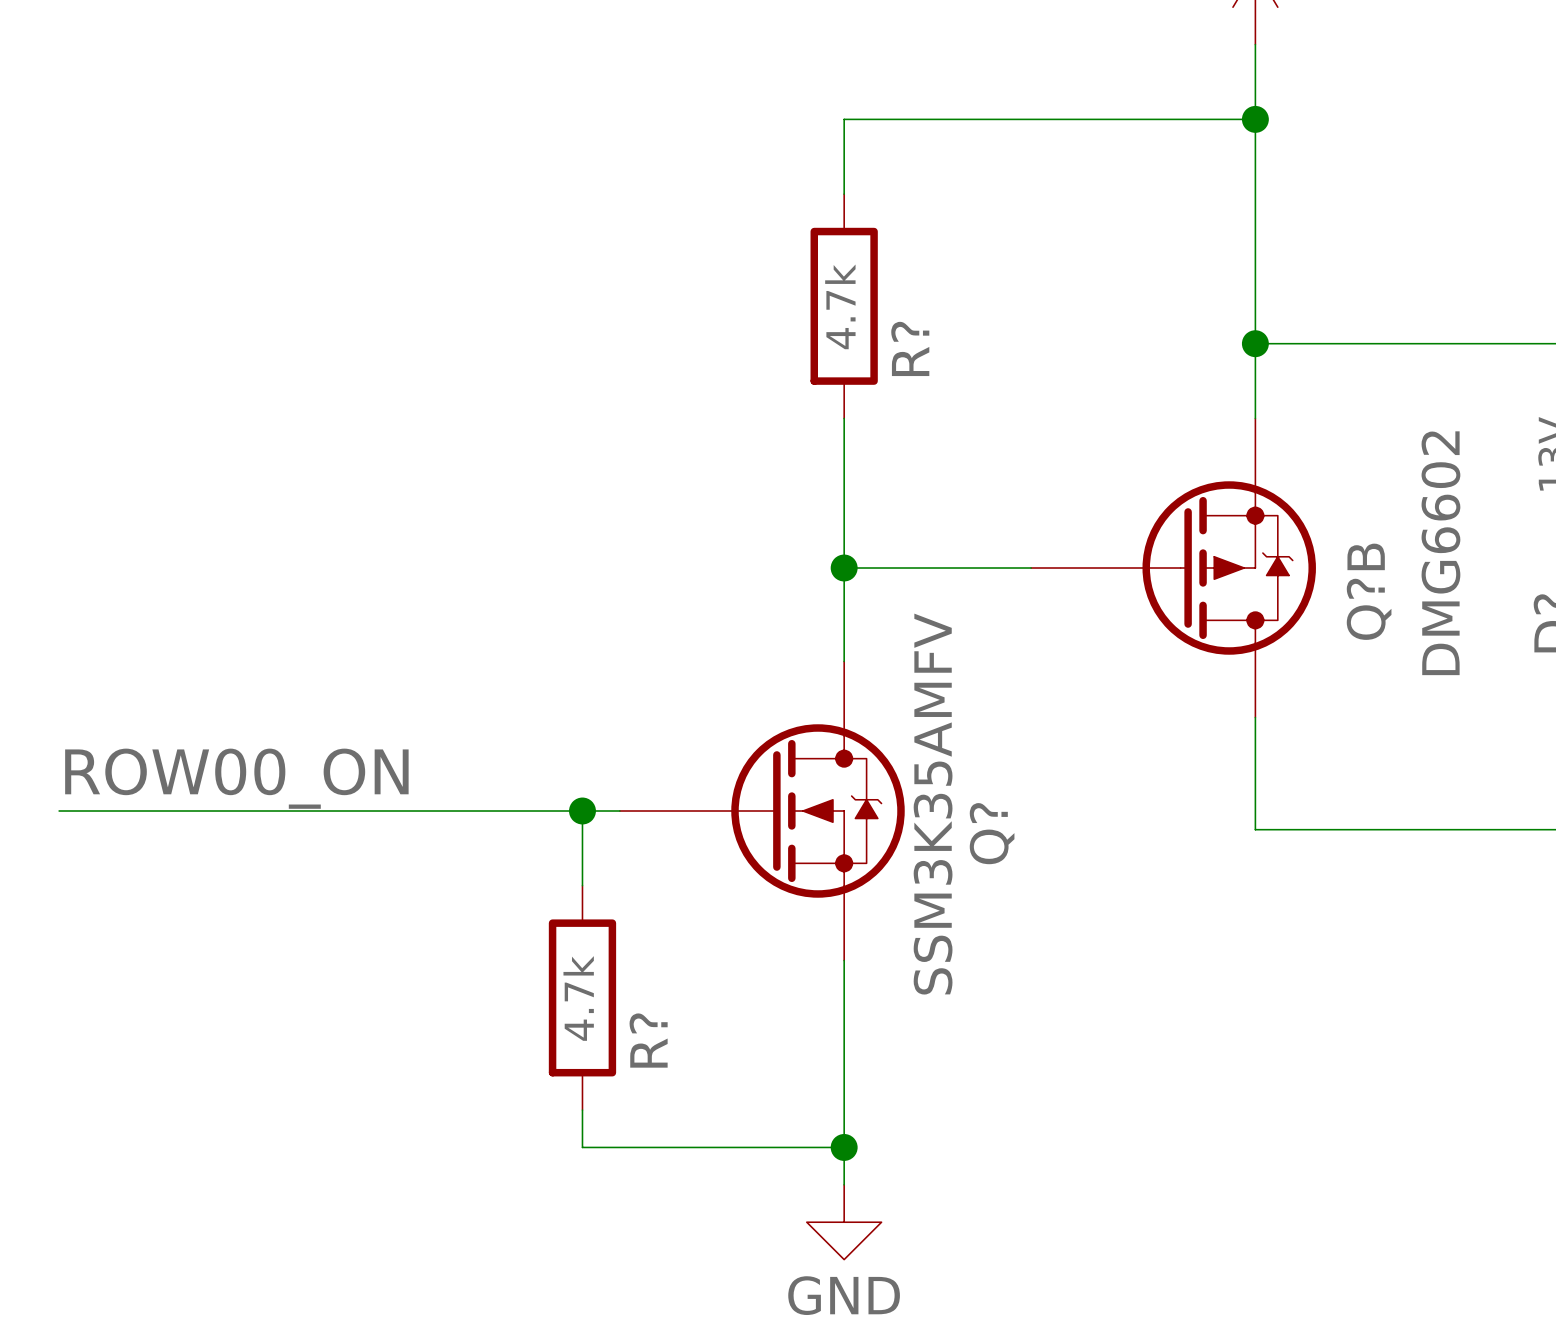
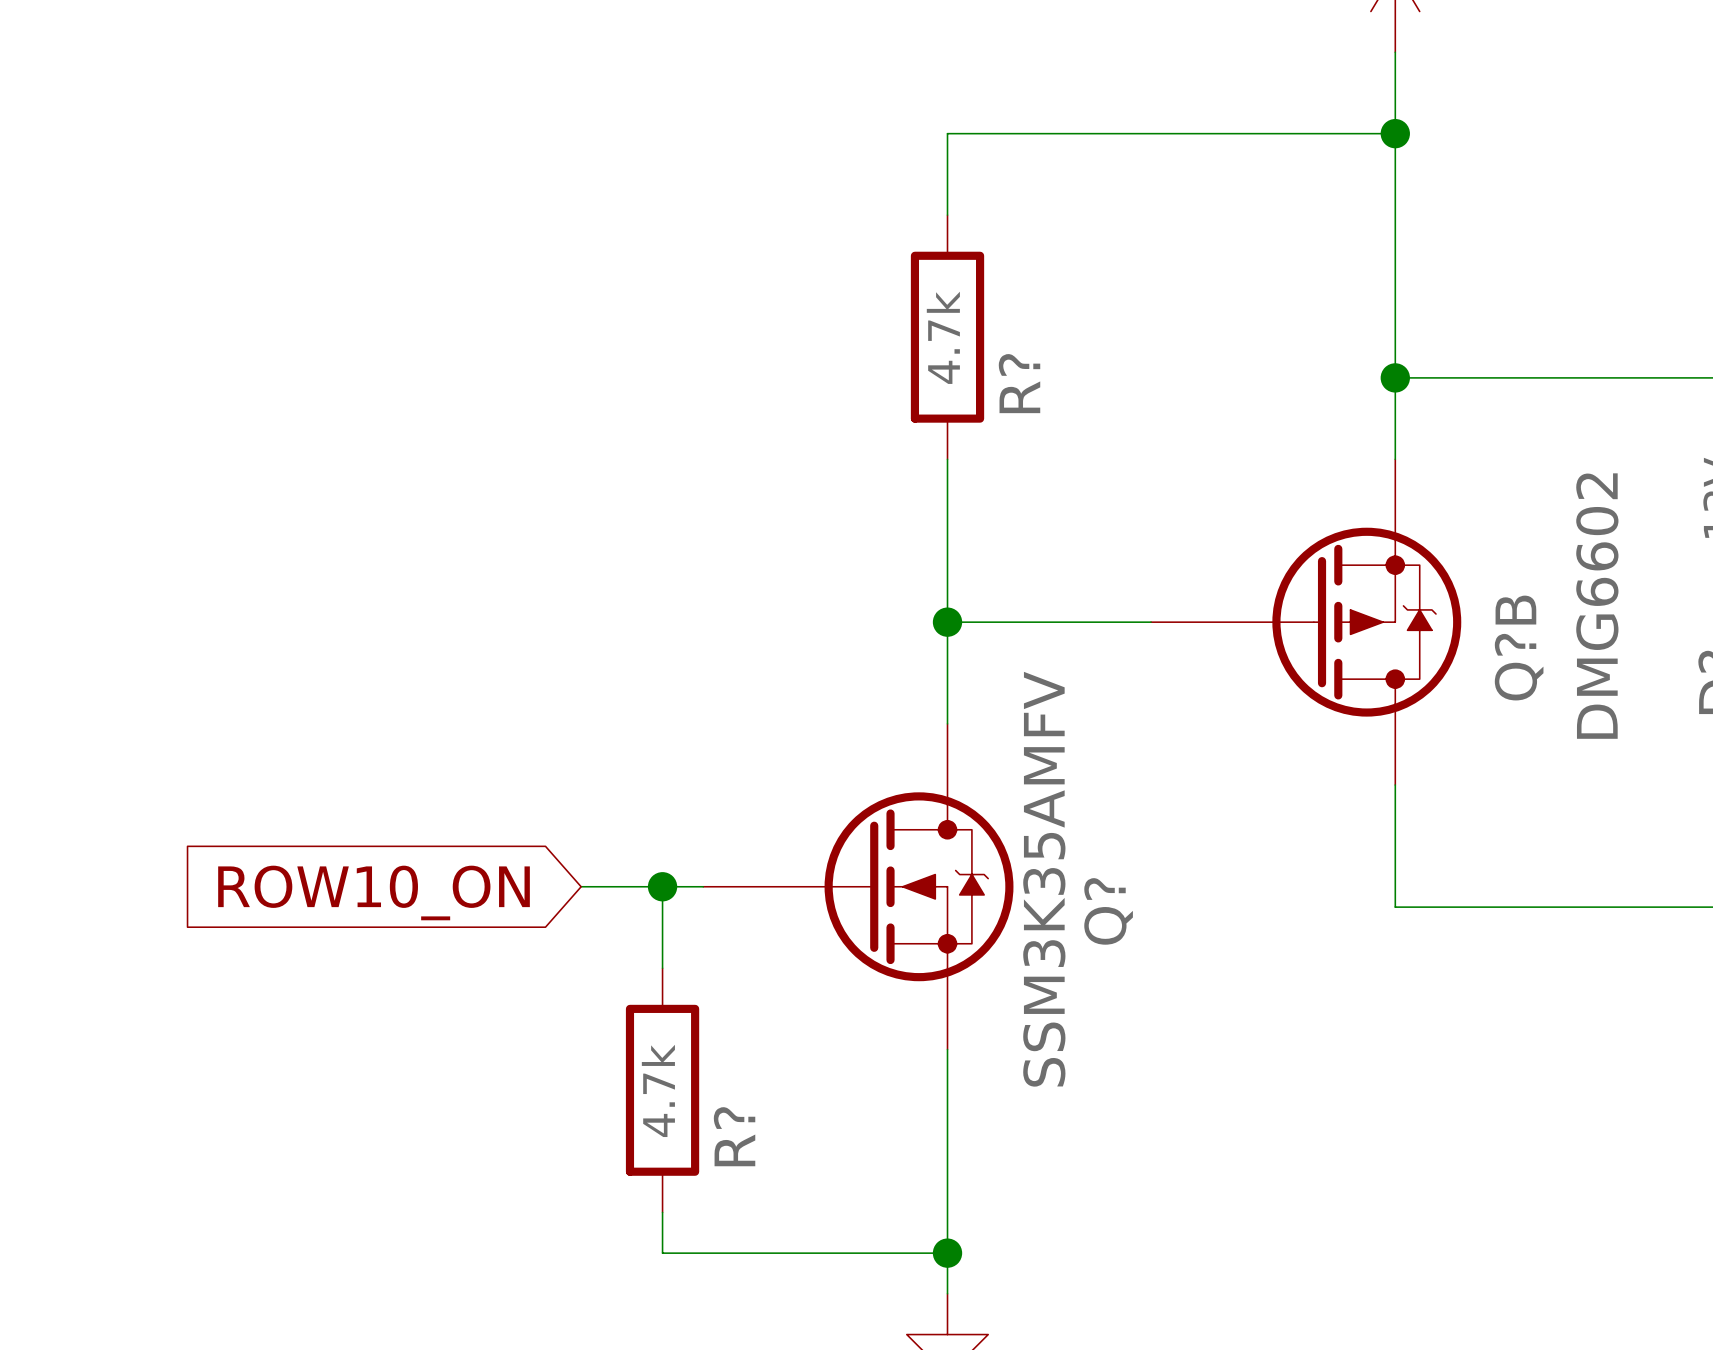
label: ROW00_ON (236, 778) -> none
wire: (59, 811) (507, 811) -> none
global label: none -> ROW10_ON (374, 892)

